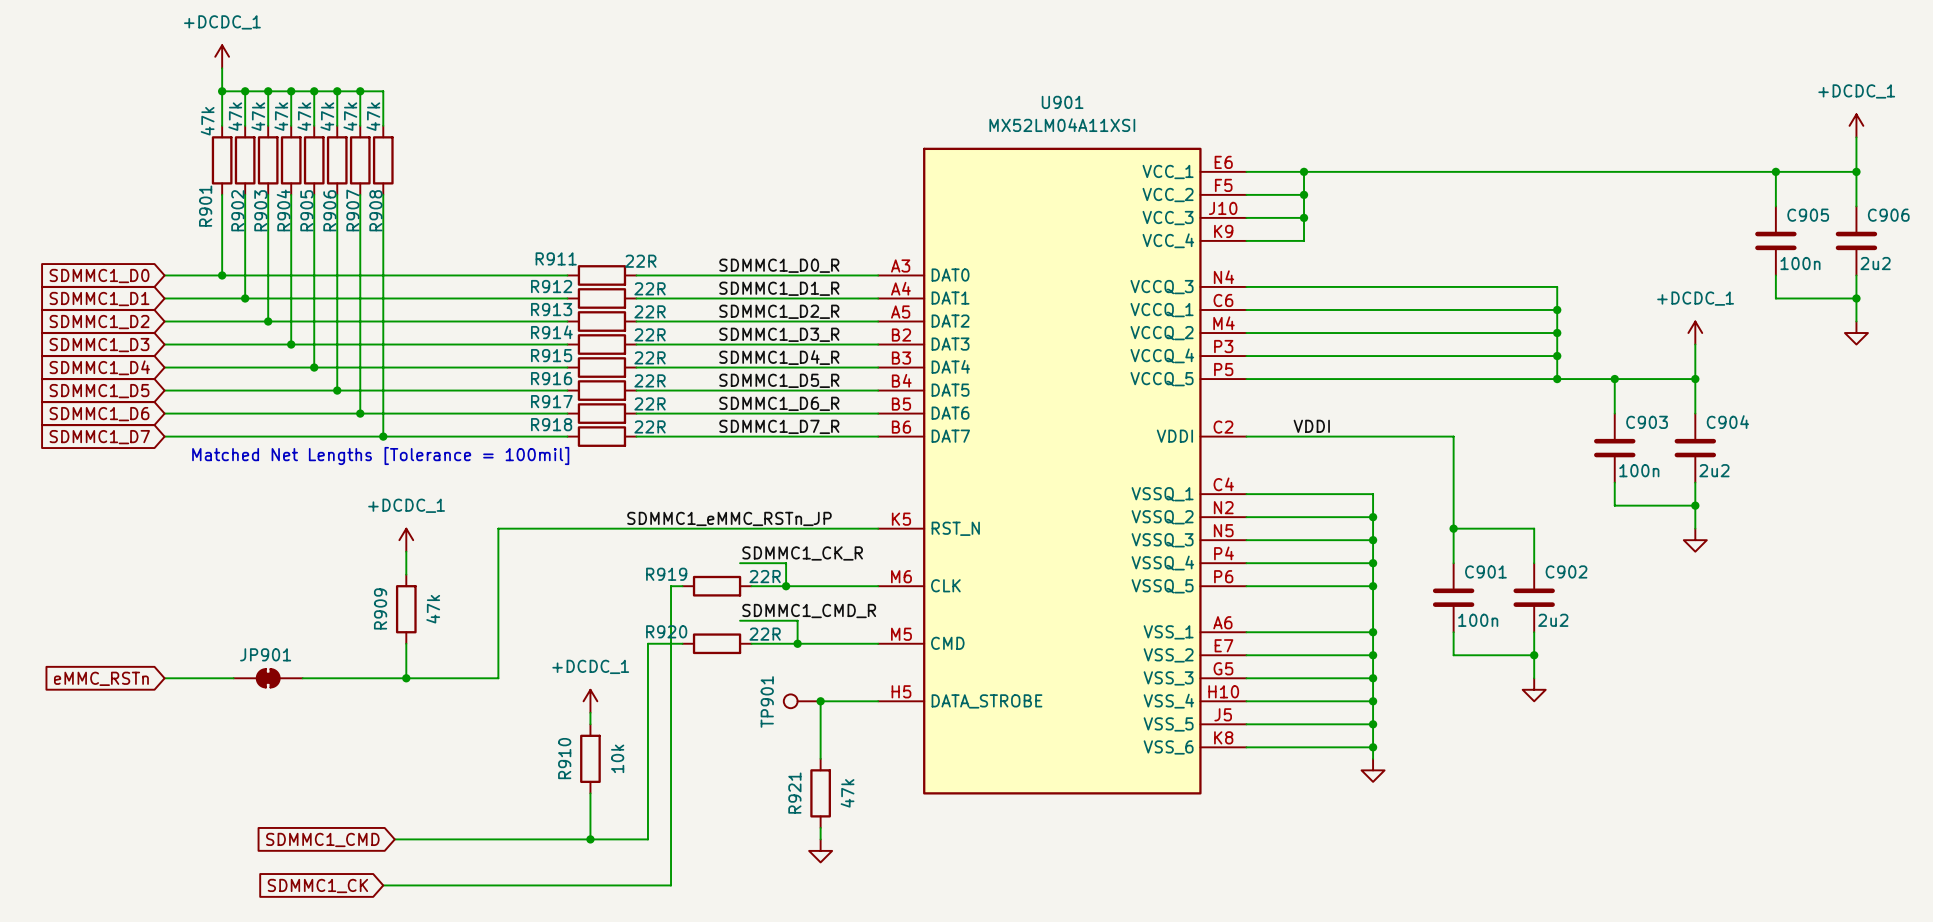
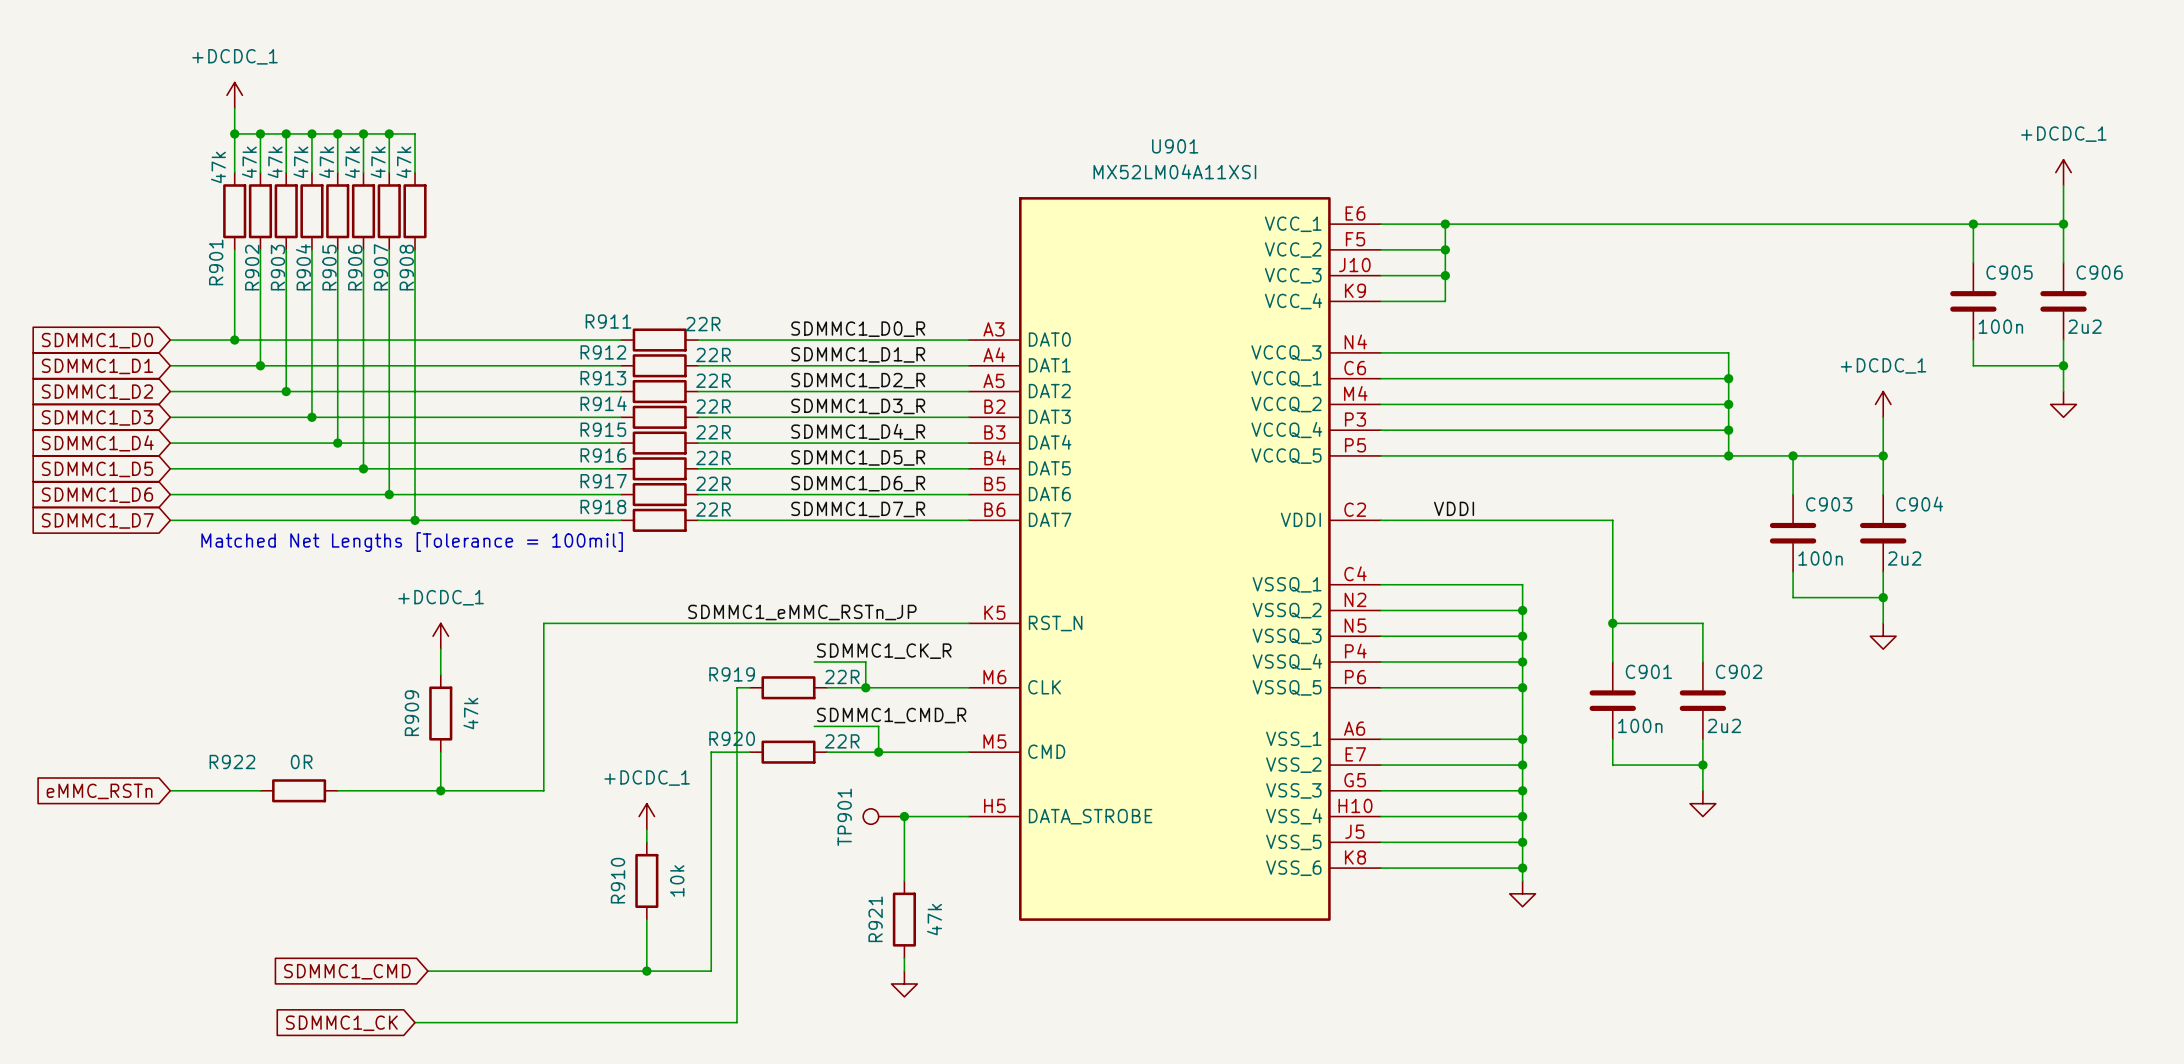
JP901: (268, 678) -> none
R922: none -> 0R (299, 790)

